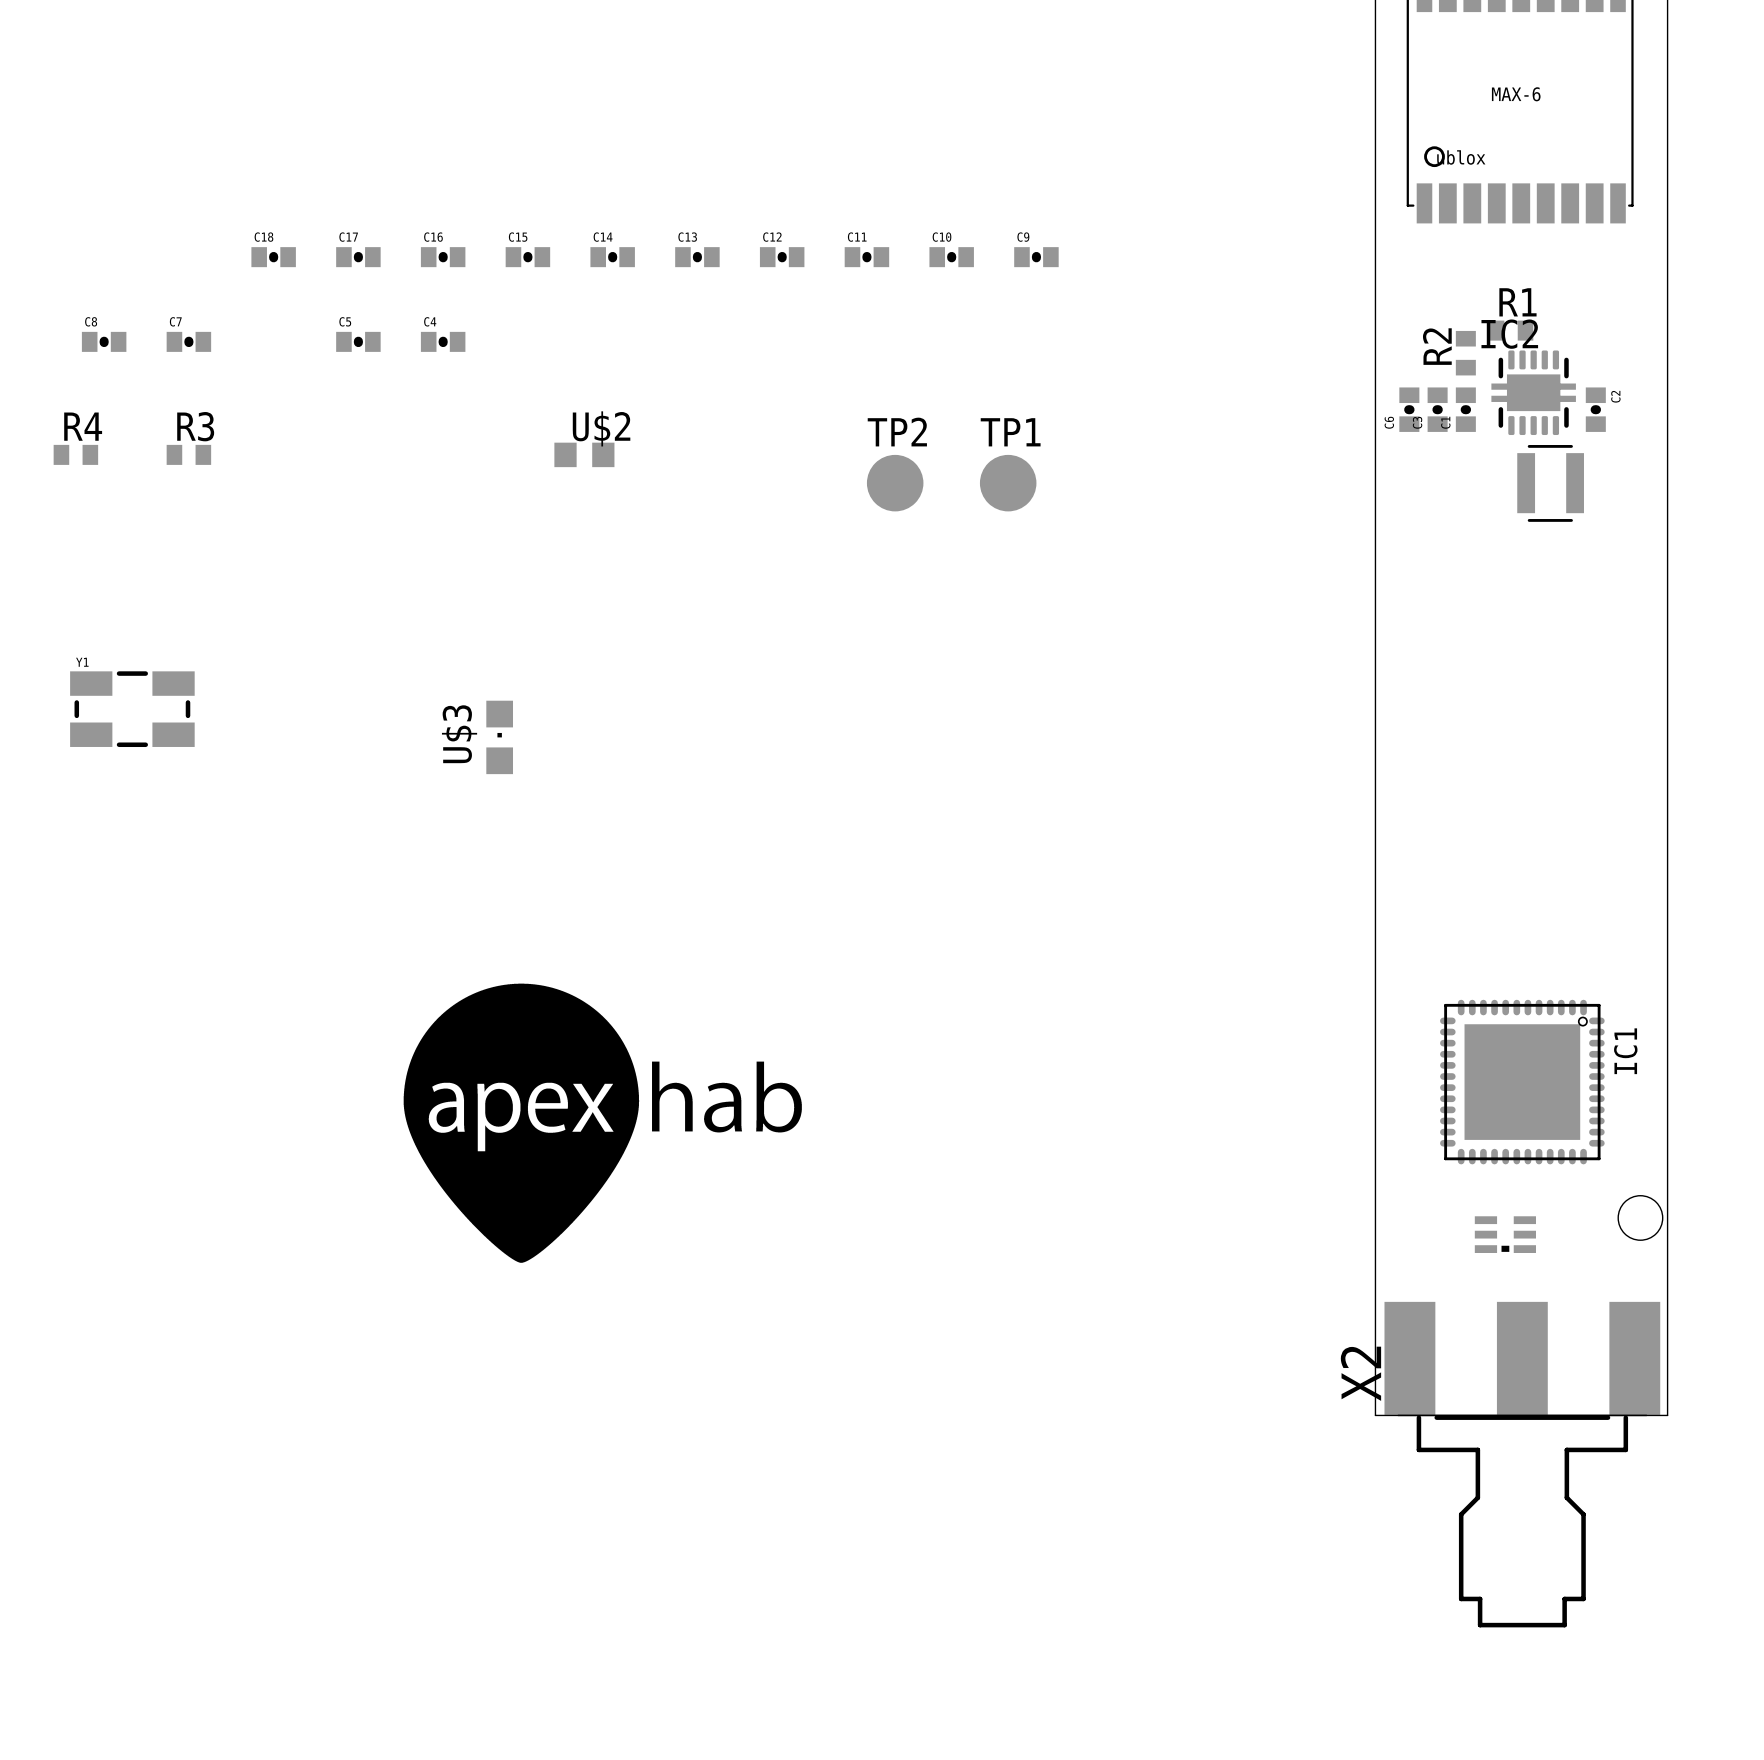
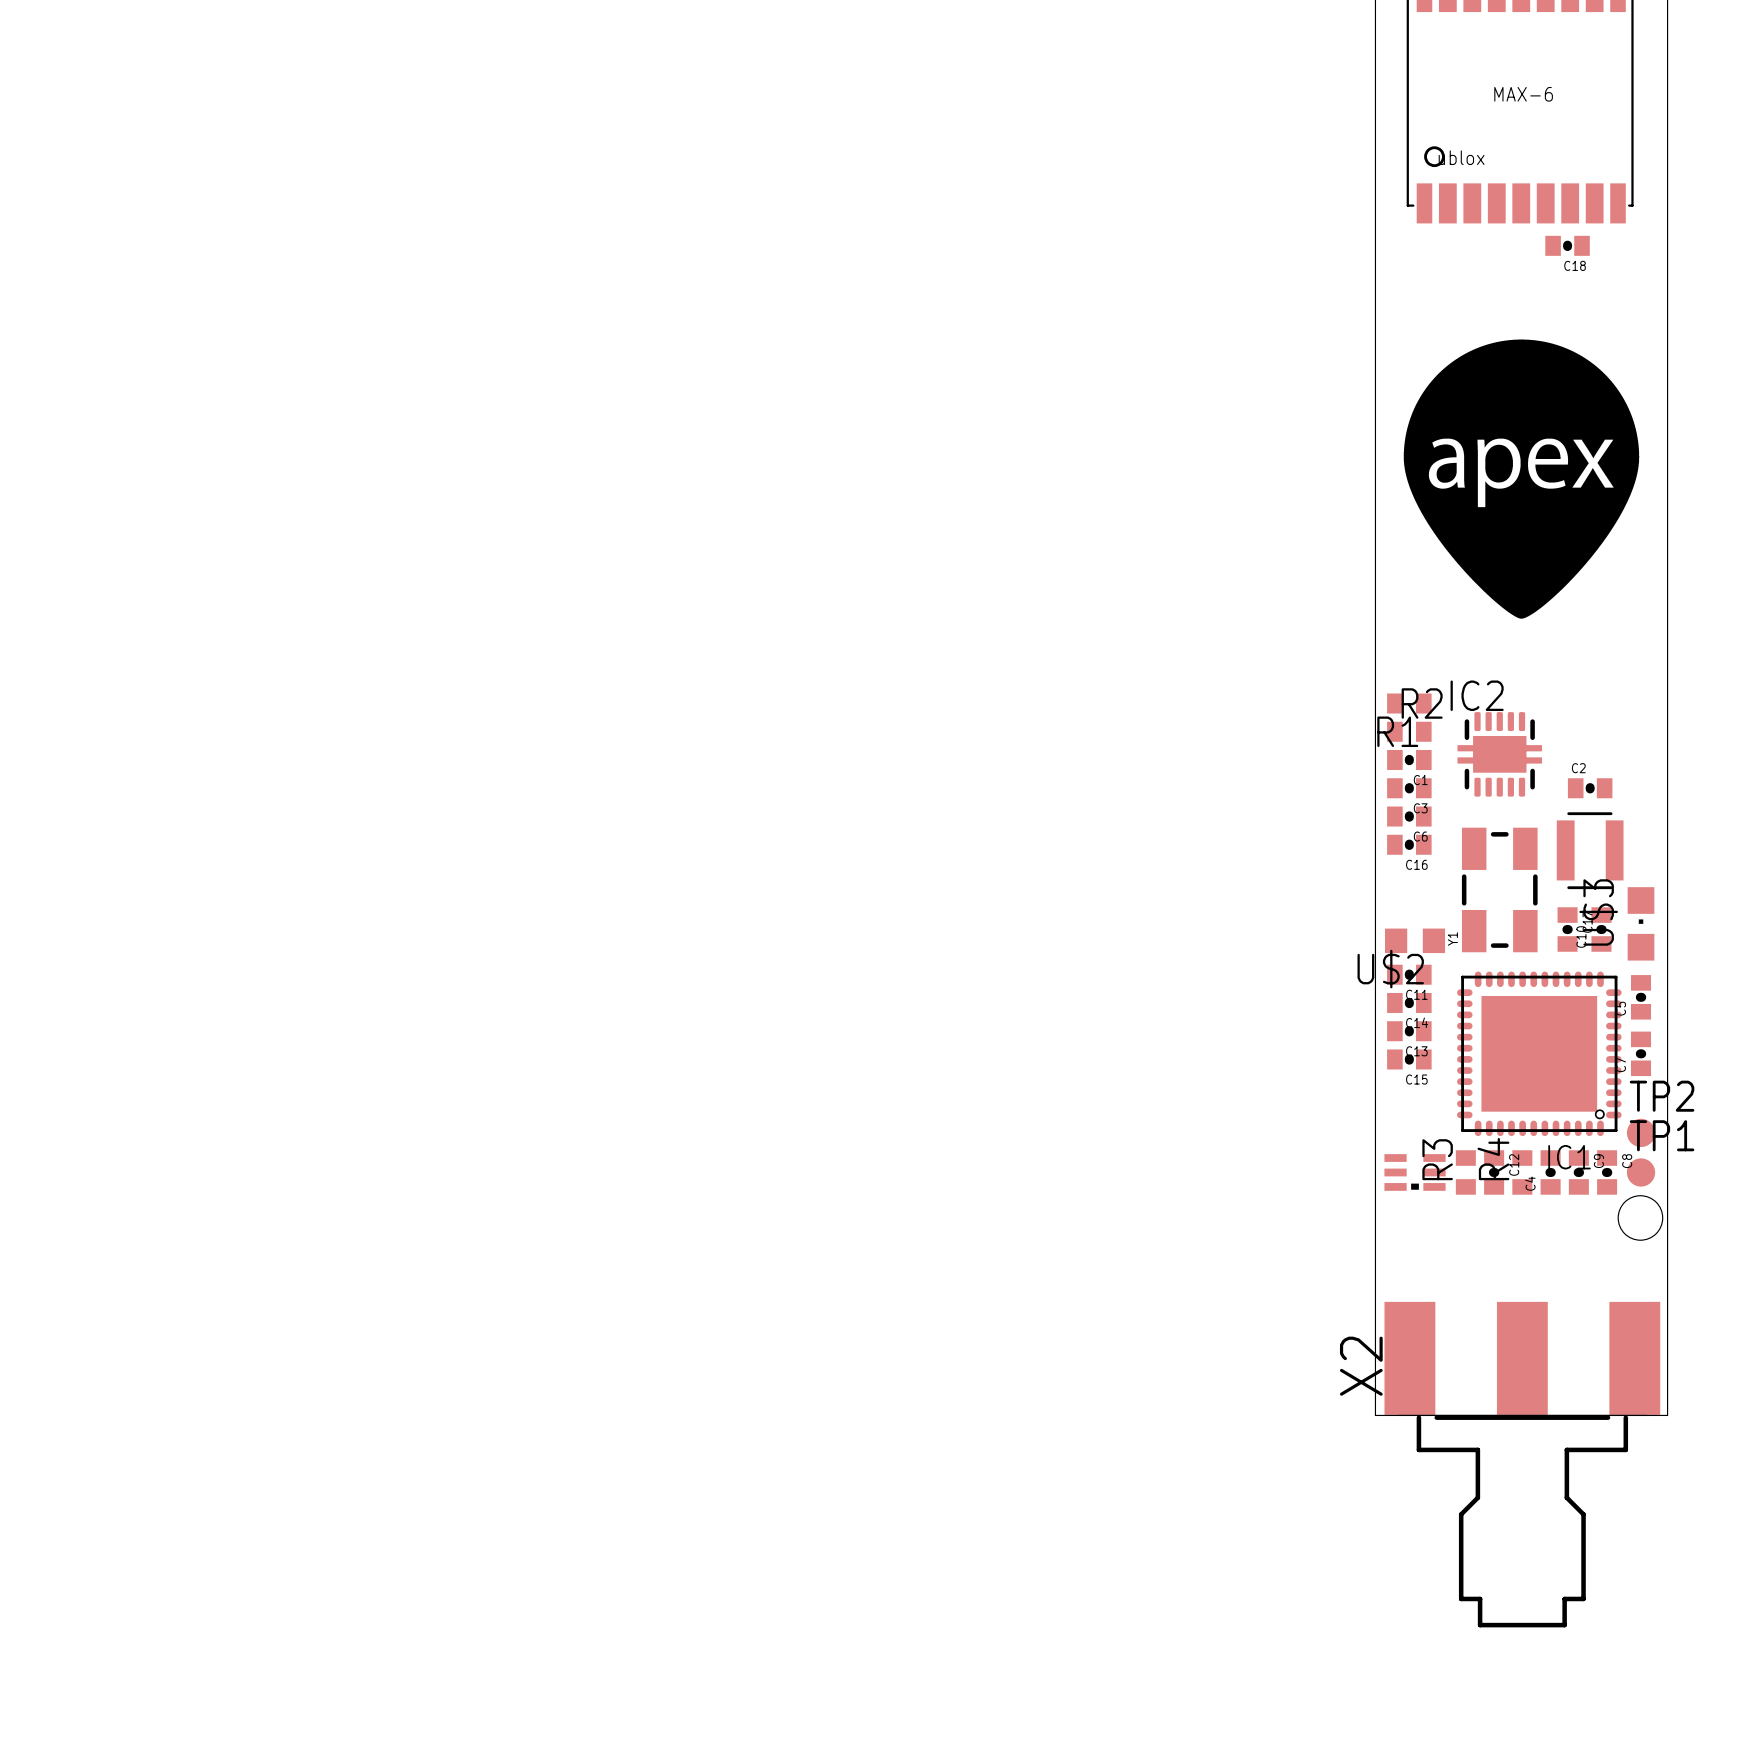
C18 name position: C18 (263, 237) -> C18 (1575, 265)
C16 name position: C16 (433, 237) -> C16 (1416, 864)
C15 name position: C15 (518, 237) -> C15 (1416, 1079)
C14 name position: C14 (603, 237) -> C14 (1417, 1022)
C13 name position: C13 (687, 237) -> C13 (1416, 1051)
C11 name position: C11 (857, 237) -> C11 (1416, 994)
C18 position: (273, 257) -> (1567, 245)
C17 rotation: 0° (358, 257) -> 90° clockwise (1567, 929)
C17 position: (358, 257) -> (1567, 929)
C16 position: (443, 257) -> (1409, 844)
C15 position: (527, 257) -> (1409, 1059)
C14 position: (612, 257) -> (1409, 1002)
C13 position: (697, 257) -> (1409, 1031)
C12 rotation: 0° (782, 257) -> 90° clockwise (1494, 1172)
C12 position: (782, 257) -> (1494, 1172)
C11 position: (866, 257) -> (1409, 974)
C10 rotation: 0° (951, 257) -> 90° clockwise (1601, 929)
C10 position: (951, 257) -> (1601, 929)
C9 rotation: 0° (1036, 257) -> 90° clockwise (1578, 1172)
C9 position: (1036, 257) -> (1578, 1172)
R1 name position: R1 (1517, 302) -> R1 (1397, 731)
R1 position: (1511, 330) -> (1409, 703)
drawing: none -> [1403, 339, 1640, 619]
C8 rotation: 0° (104, 341) -> 90° clockwise (1607, 1172)
C8 position: (104, 341) -> (1607, 1172)
C7 rotation: 0° (188, 341) -> 90° clockwise (1641, 1053)
C7 position: (188, 341) -> (1641, 1053)
C5 rotation: 0° (358, 341) -> 90° clockwise (1641, 997)
C5 position: (358, 341) -> (1641, 997)
C4 rotation: 0° (443, 341) -> 90° clockwise (1550, 1172)
C4 position: (443, 341) -> (1550, 1172)
R2 rotation: 0° (1465, 353) -> 90° clockwise (1409, 731)
R2 position: (1465, 353) -> (1409, 731)
IC2 position: (1533, 392) -> (1499, 754)
C6 rotation: 0° (1409, 409) -> 90° clockwise (1409, 816)
C6 position: (1409, 409) -> (1409, 816)
C3 rotation: 0° (1437, 409) -> 90° clockwise (1409, 788)
C3 position: (1437, 409) -> (1409, 788)
C1 rotation: 0° (1465, 409) -> 90° clockwise (1409, 760)
C1 position: (1465, 409) -> (1409, 760)
C2 rotation: 0° (1595, 409) -> 90° clockwise (1590, 788)
C2 position: (1595, 409) -> (1590, 788)
R4 name position: R4 (83, 426) -> R4 (1493, 1159)
R3 name position: R3 (195, 426) -> R3 (1437, 1159)
U$2 name position: U$2 (601, 428) -> U$2 (1390, 969)
R4 rotation: 0° (75, 454) -> 90° clockwise (1522, 1172)
R4 position: (75, 454) -> (1522, 1172)
R3 rotation: 0° (188, 454) -> 90° clockwise (1465, 1172)
R3 position: (188, 454) -> (1465, 1172)
U$2 position: (584, 454) -> (1415, 940)
TP2 footprint: [866, 454, 924, 512] -> [1626, 1118, 1656, 1148]
TP1 footprint: [979, 454, 1037, 512] -> [1626, 1158, 1656, 1187]
part position: (1550, 483) -> (1590, 850)
Y1 name position: Y1 (82, 662) -> Y1 (1452, 939)
Y1 rotation: 0° (132, 709) -> 90° clockwise (1499, 889)
Y1 position: (132, 709) -> (1499, 889)
U$3 position: (499, 737) -> (1641, 923)
drawing: [403, 983, 802, 1263] -> none
IC1 rotation: 0° (1522, 1082) -> 90° clockwise (1539, 1053)
part position: (1505, 1234) -> (1415, 1172)

